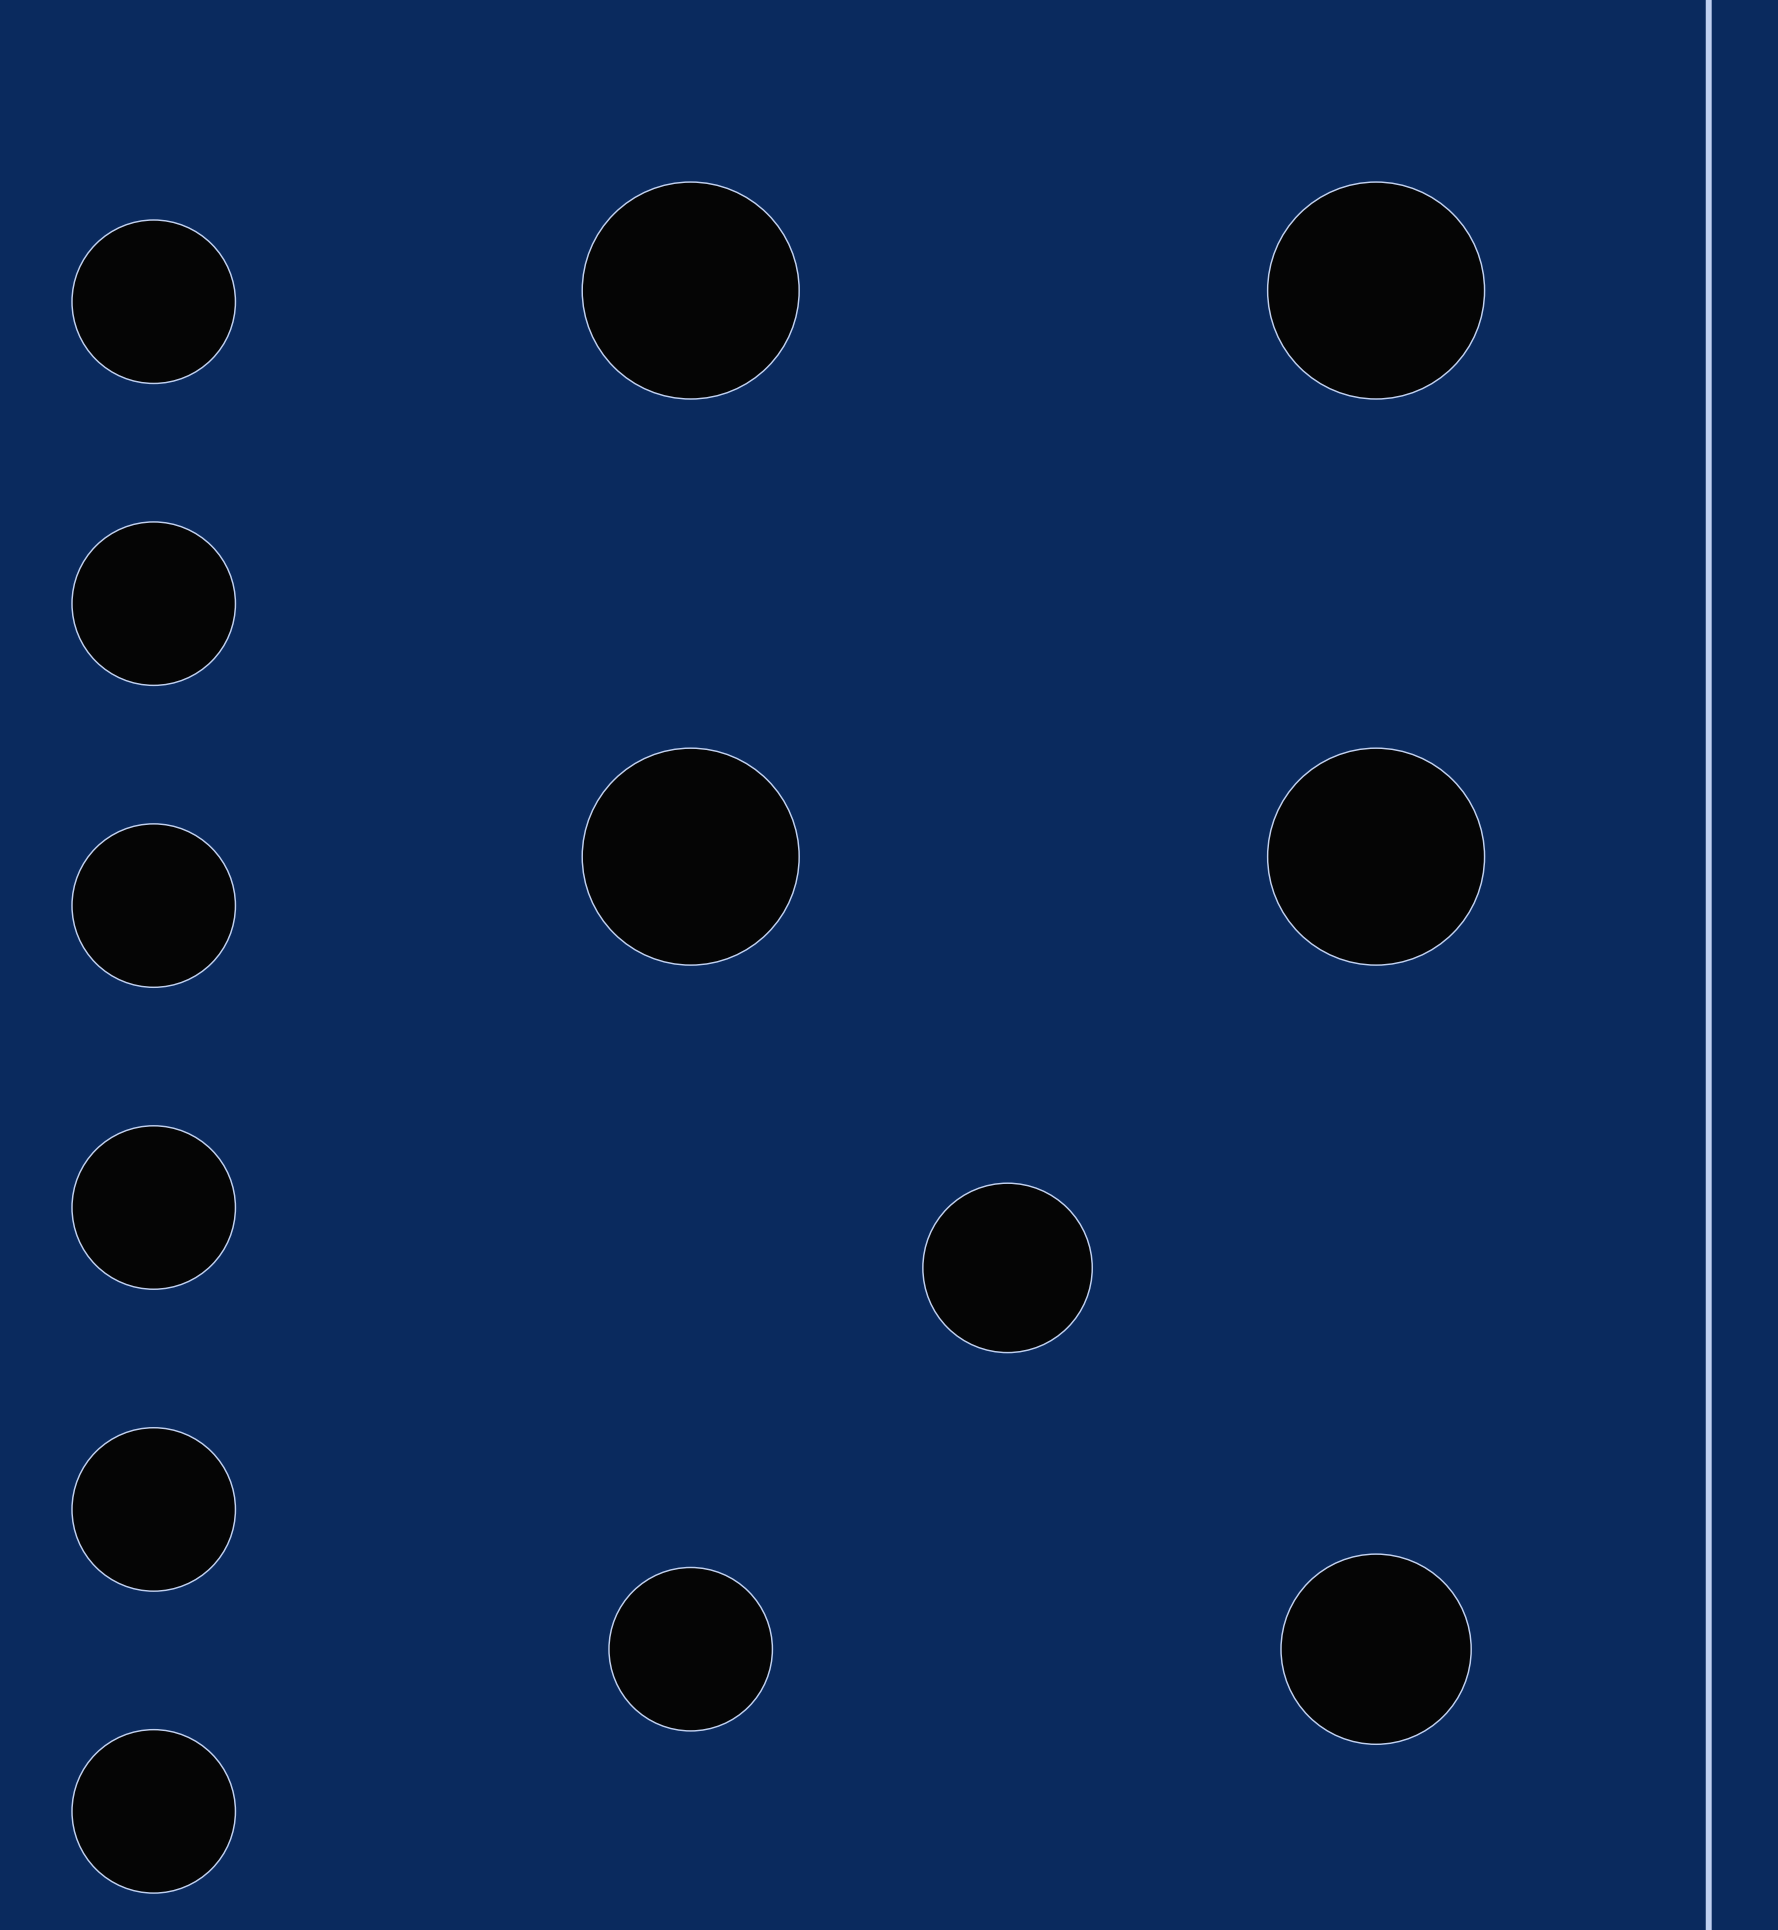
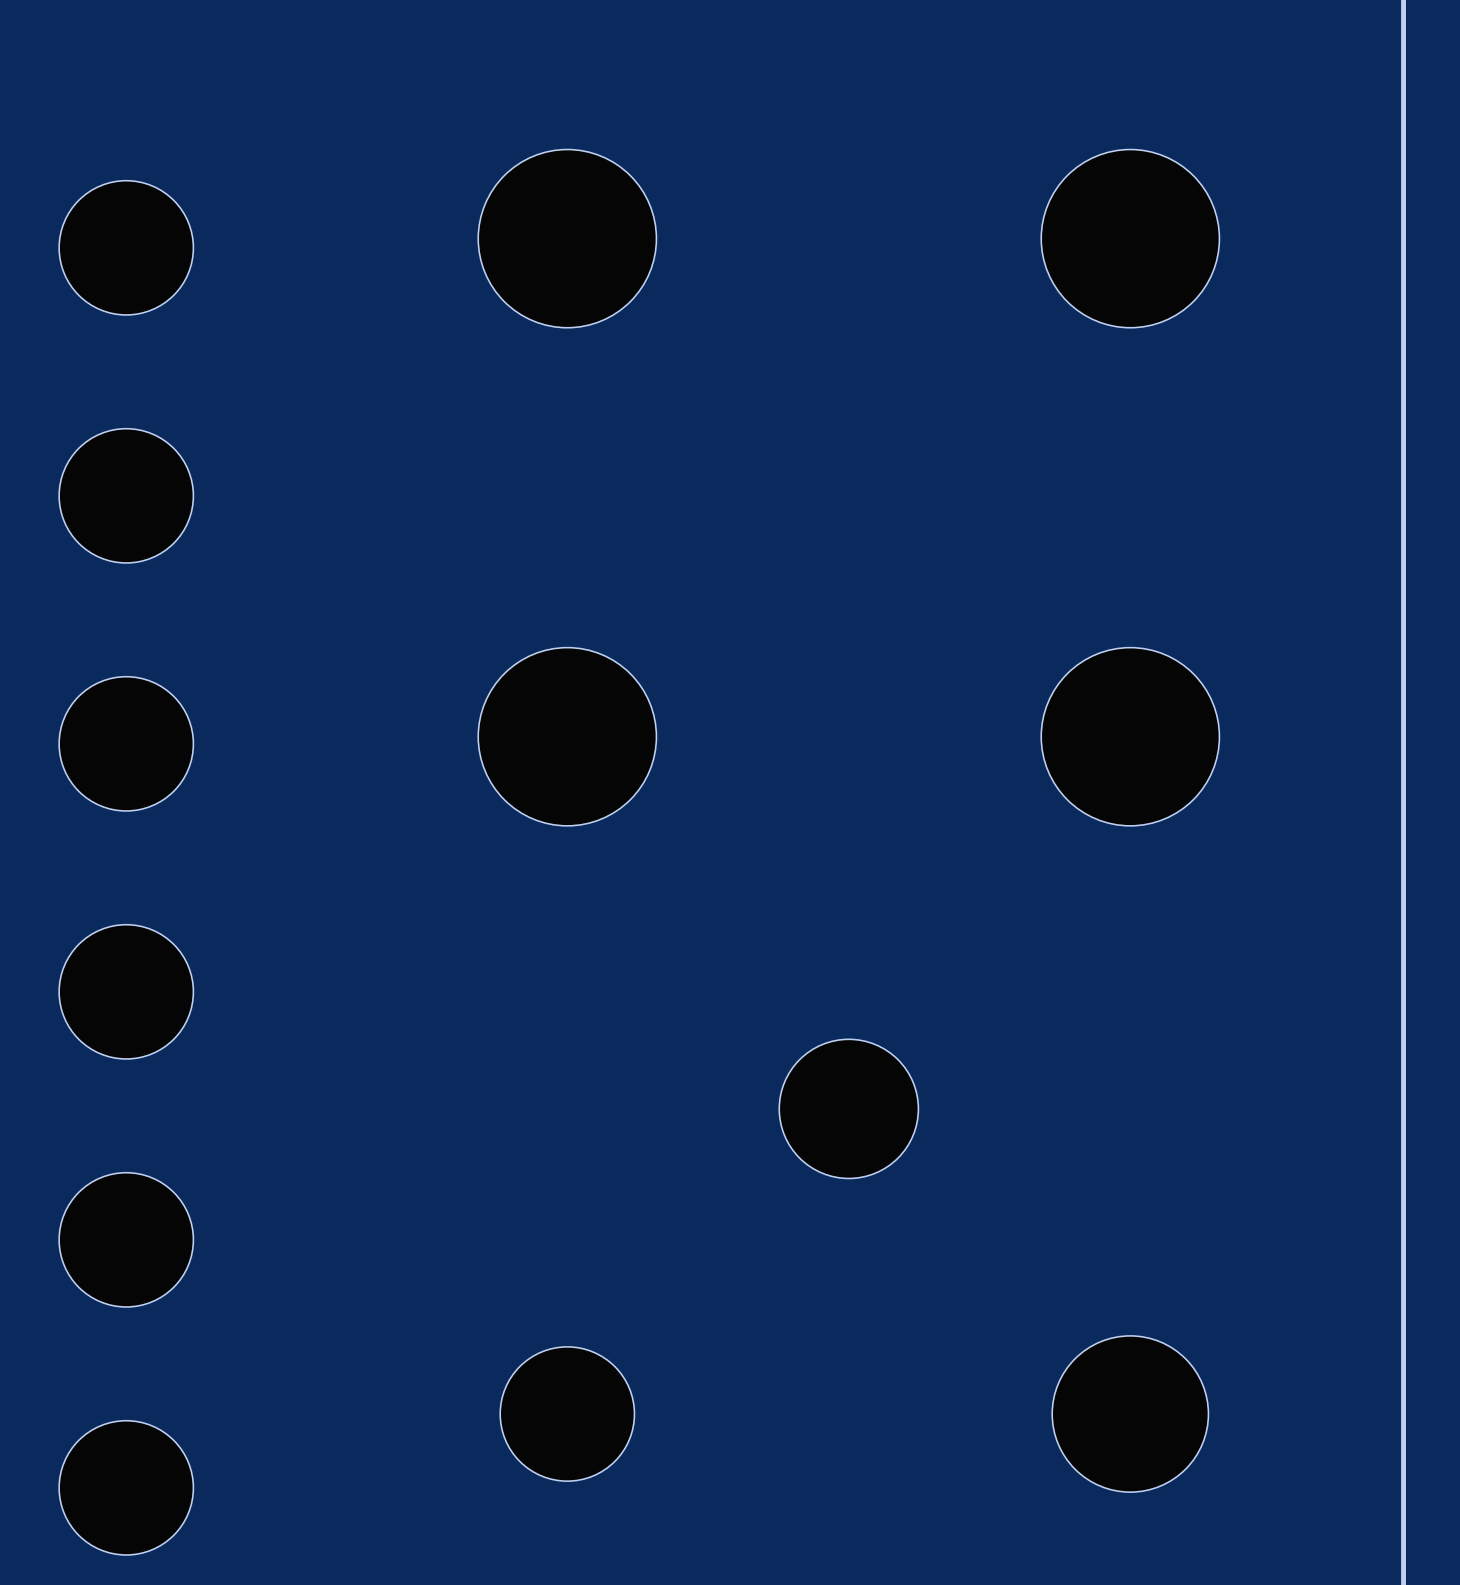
part position: (690, 856) -> (567, 736)
part position: (1376, 856) -> (1130, 736)
part position: (1007, 1267) -> (848, 1108)
part position: (690, 1649) -> (567, 1414)
part position: (1376, 1649) -> (1130, 1414)

